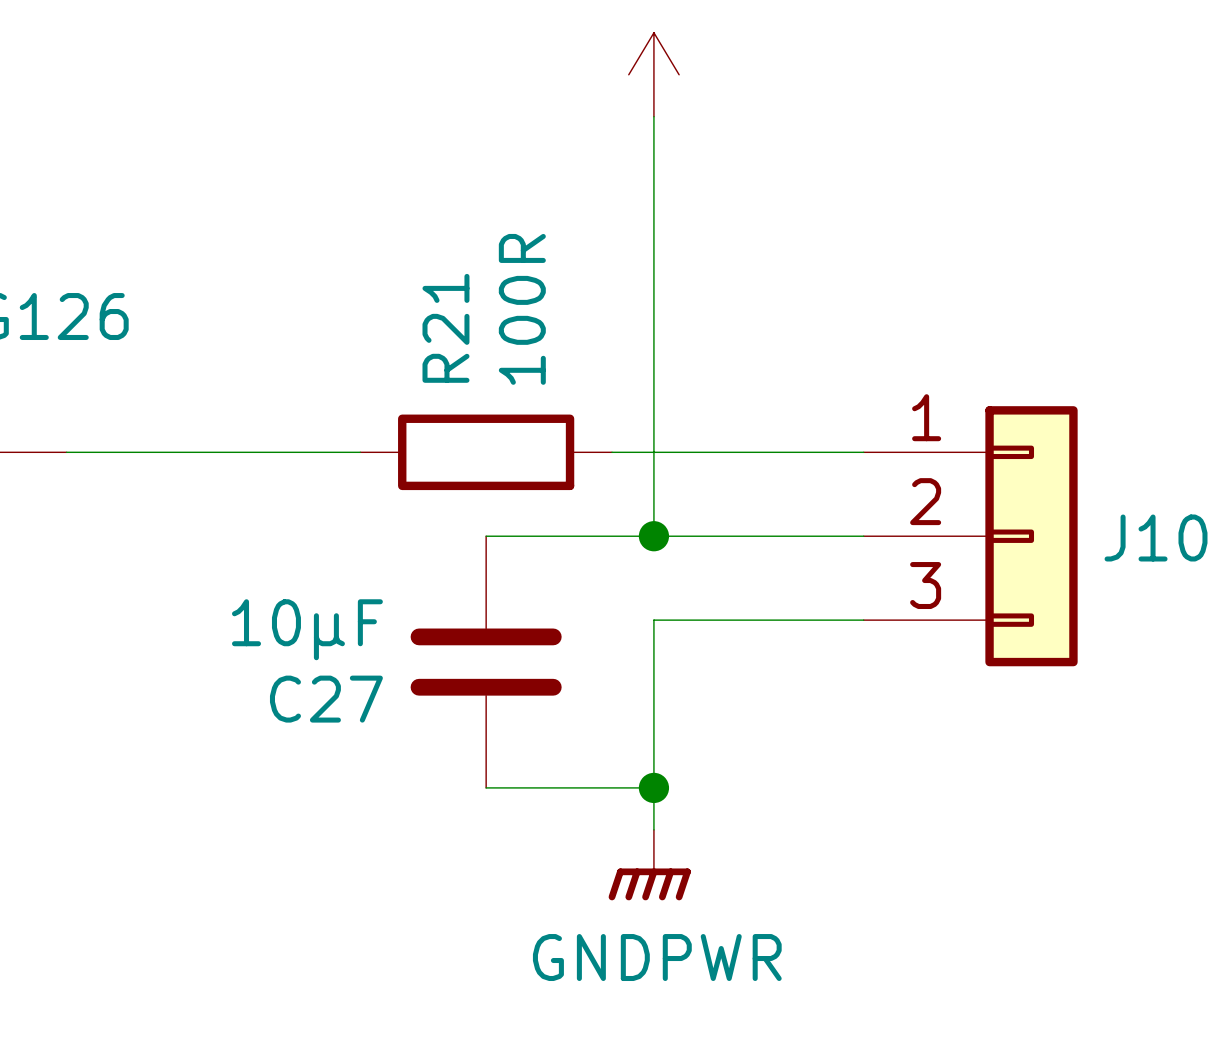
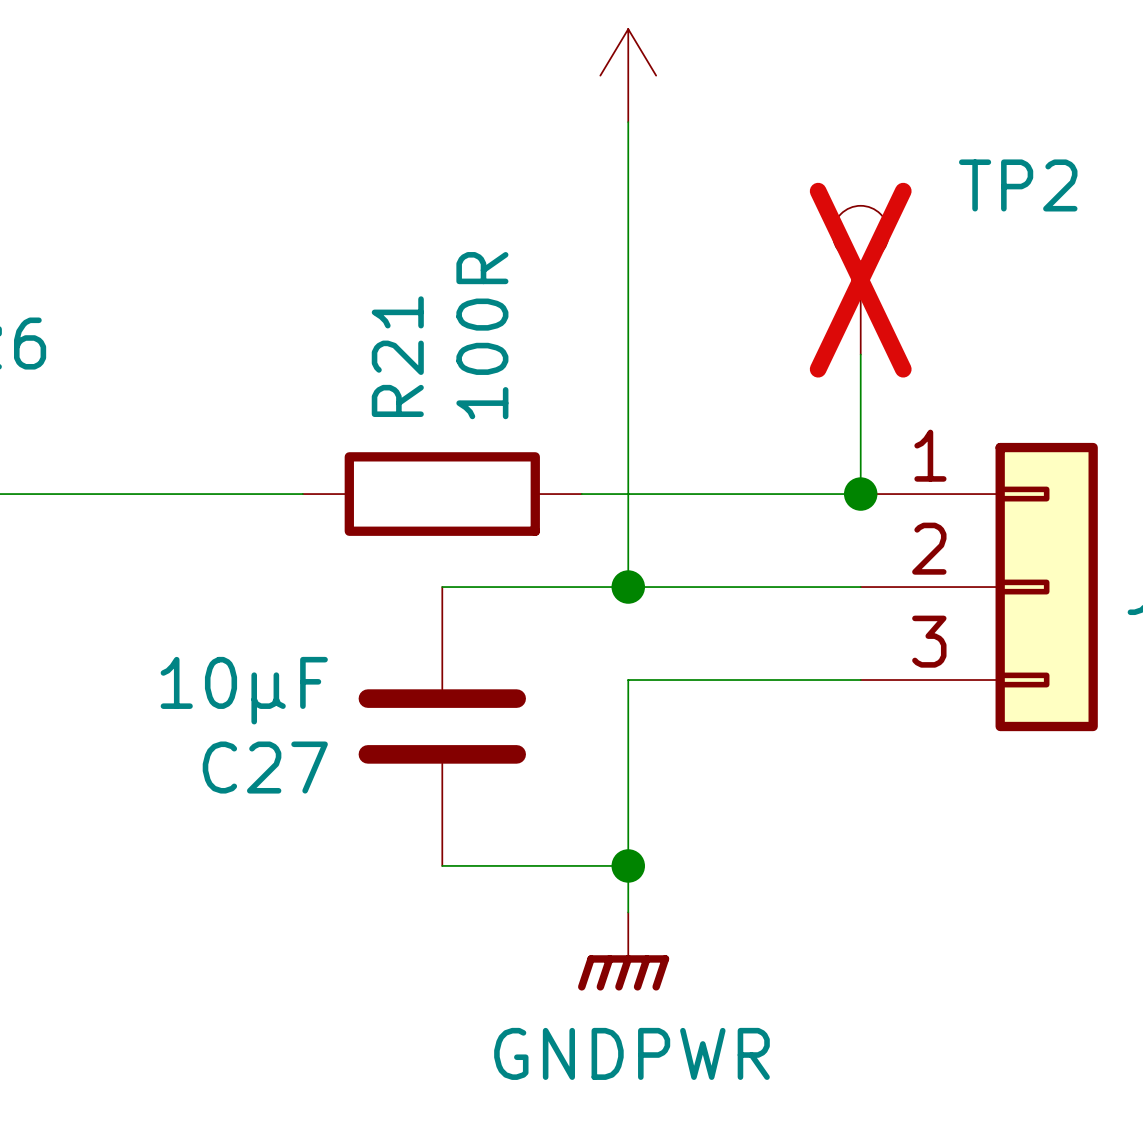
TP2: none -> (860, 280)
wire: none -> (860, 354) (860, 494)
junction: none -> (860, 494)

